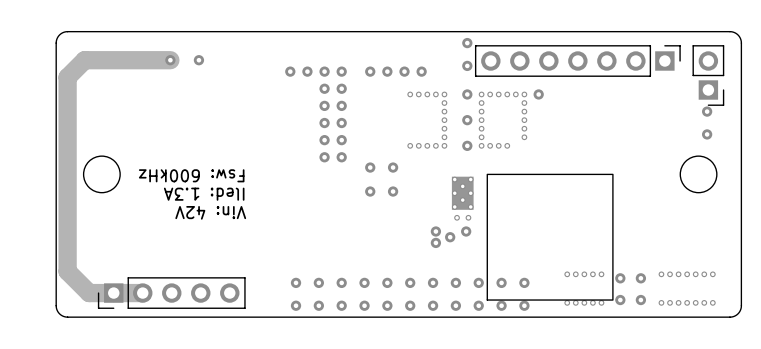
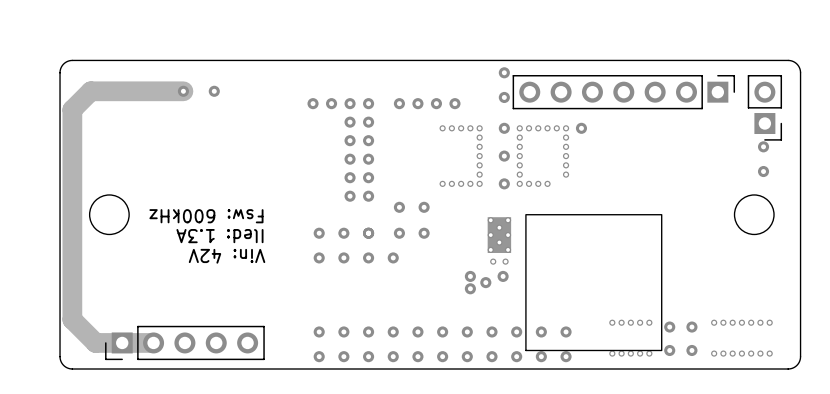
via: none -> (319, 233)
via: none -> (343, 233)
via: none -> (368, 233)
via: none -> (319, 257)
via: none -> (343, 257)
via: none -> (368, 257)
via: none -> (393, 257)

